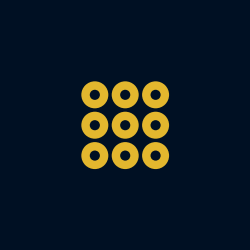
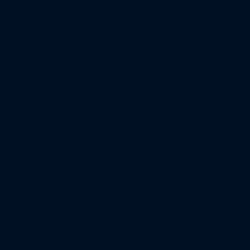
part: (125, 125) -> none

